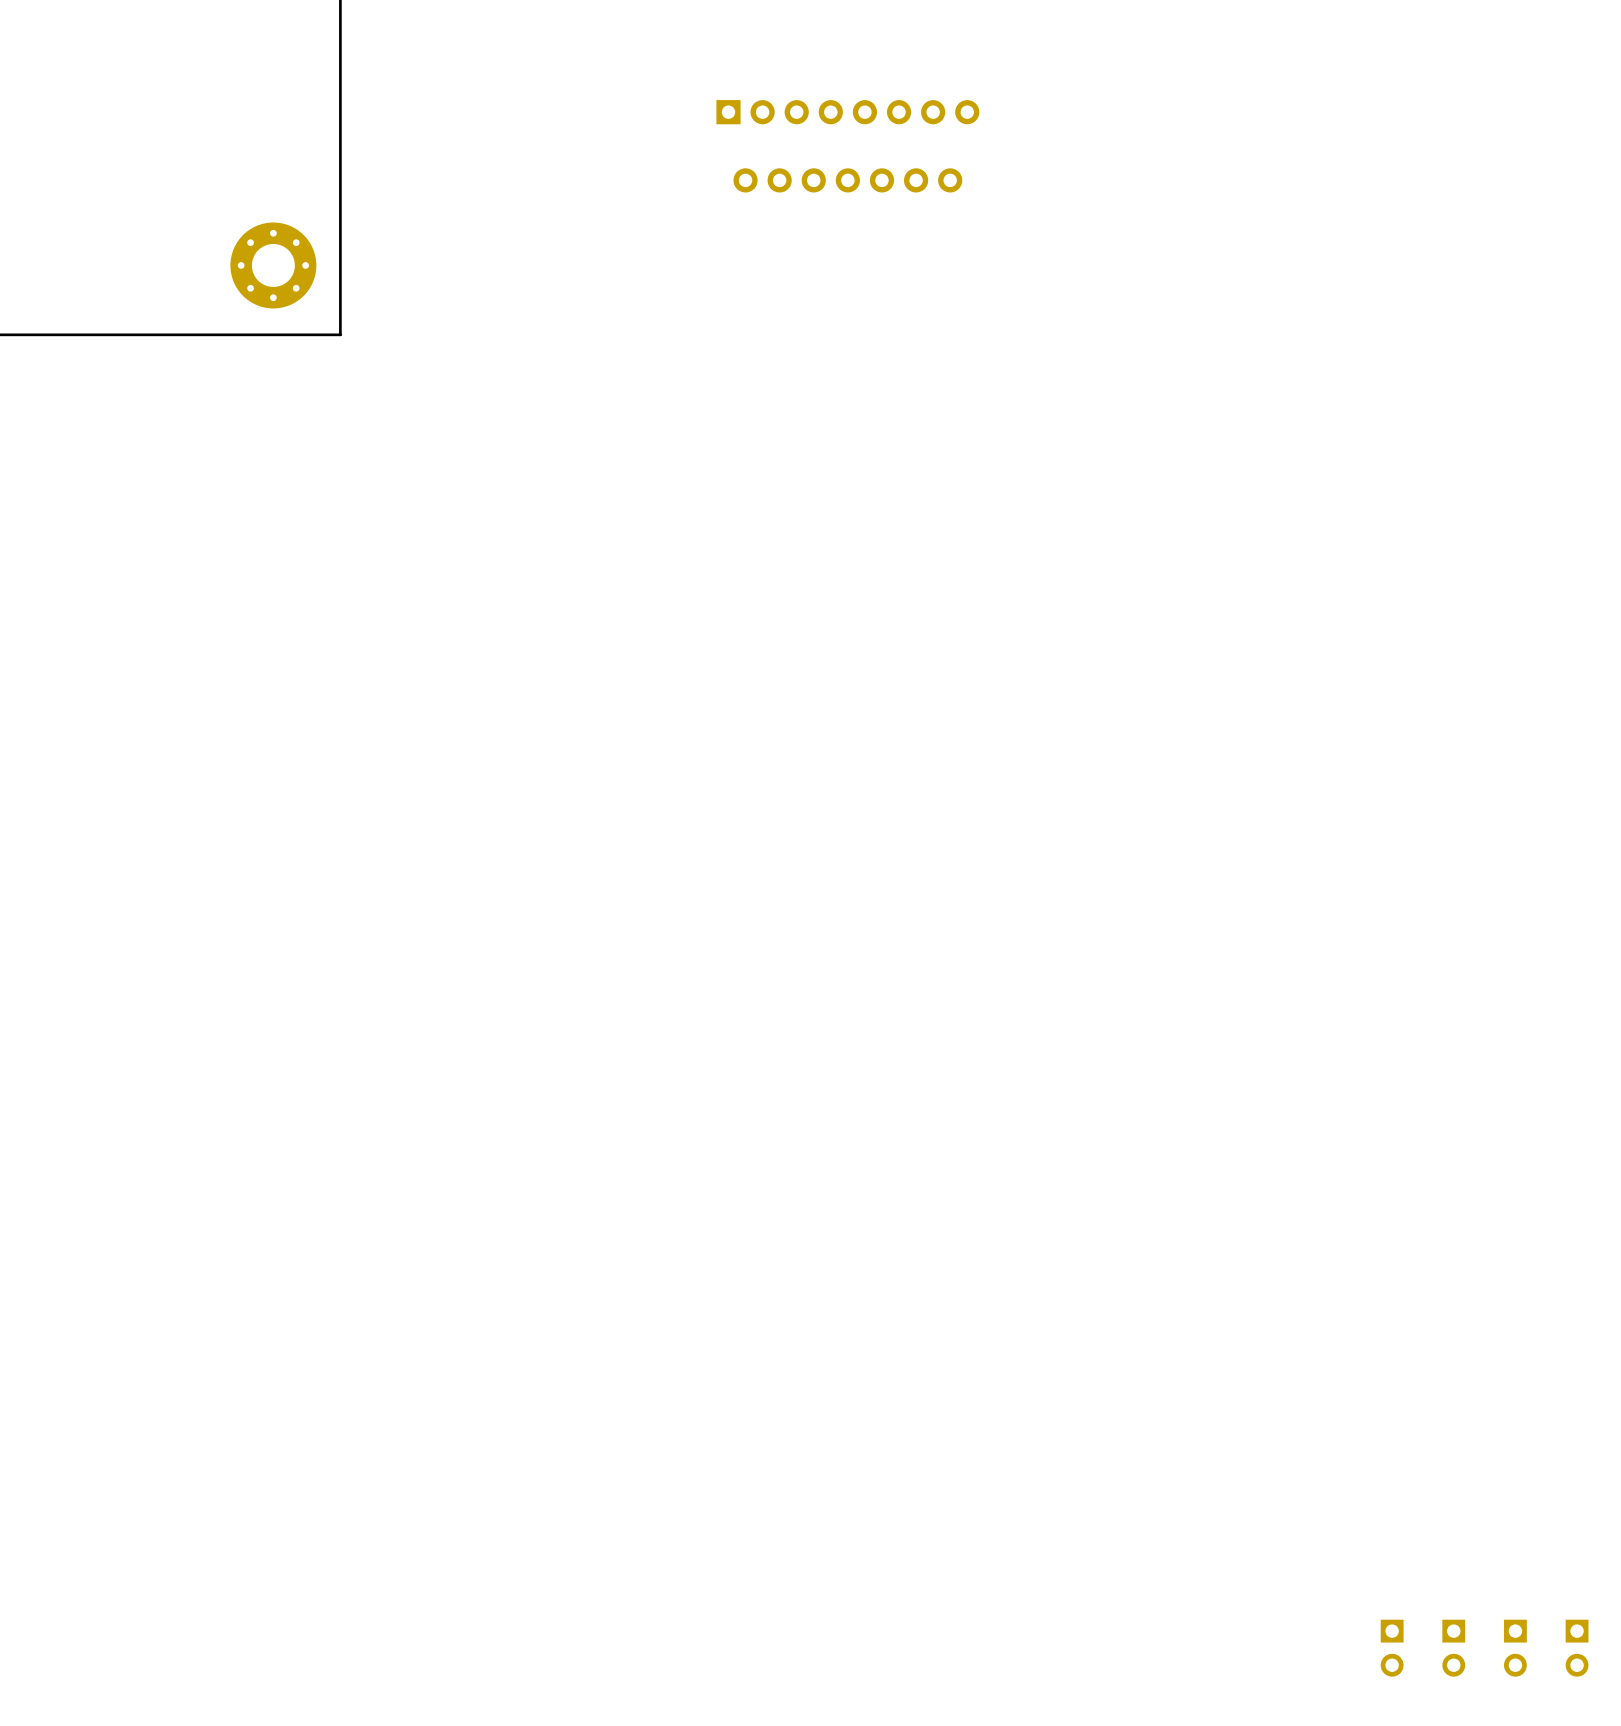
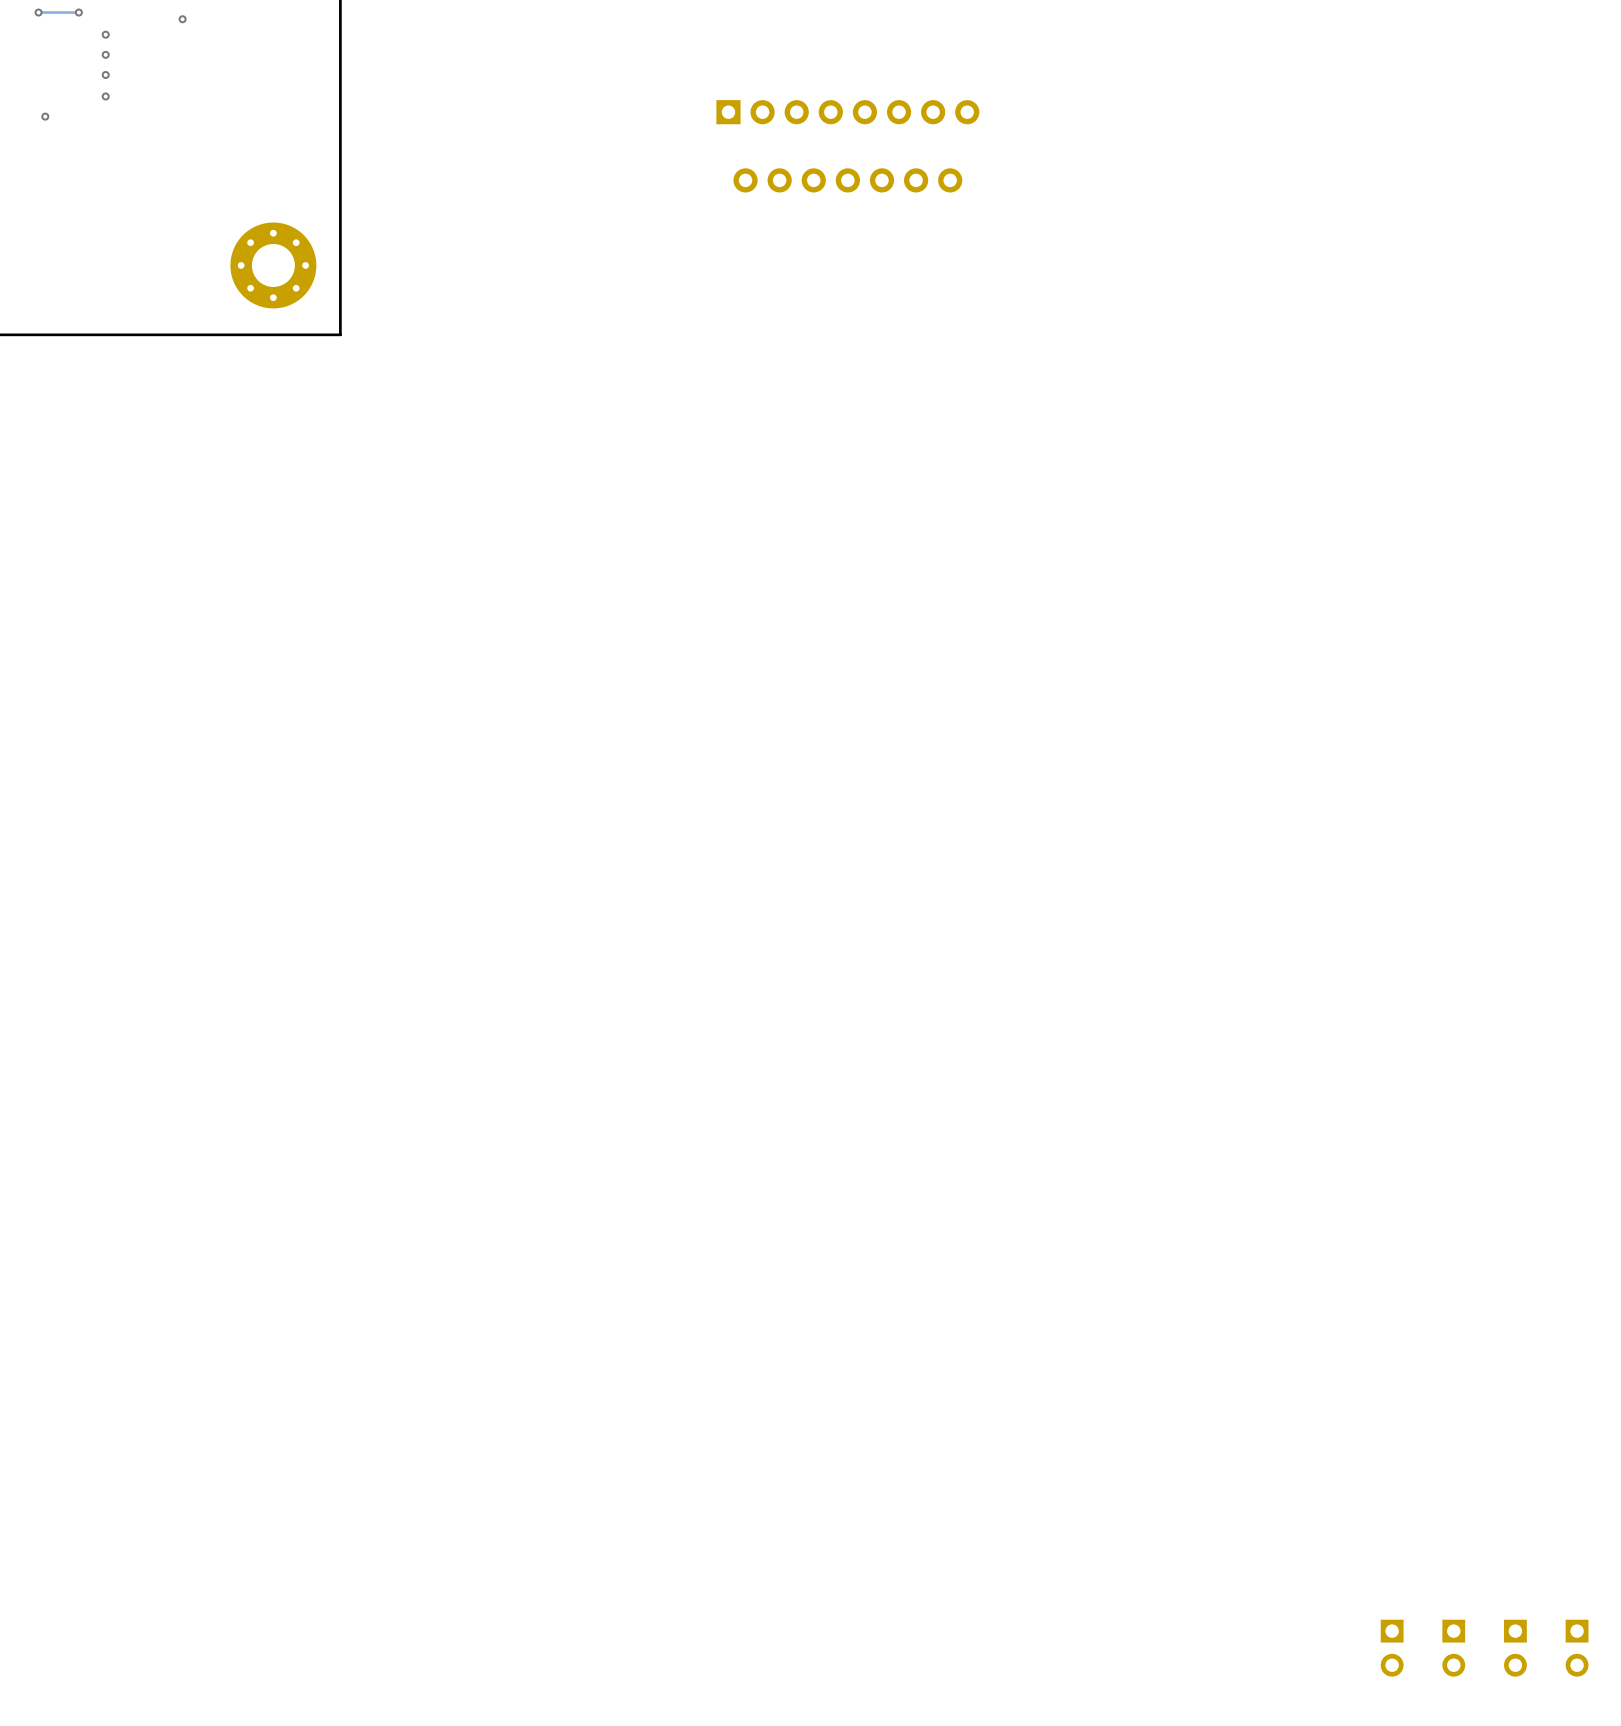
via: none -> (38, 12)
track: none -> (78, 12) (38, 12)
via: none -> (78, 12)
via: none -> (182, 19)
via: none -> (105, 34)
via: none -> (105, 54)
via: none -> (105, 74)
via: none -> (105, 96)
via: none -> (45, 116)

